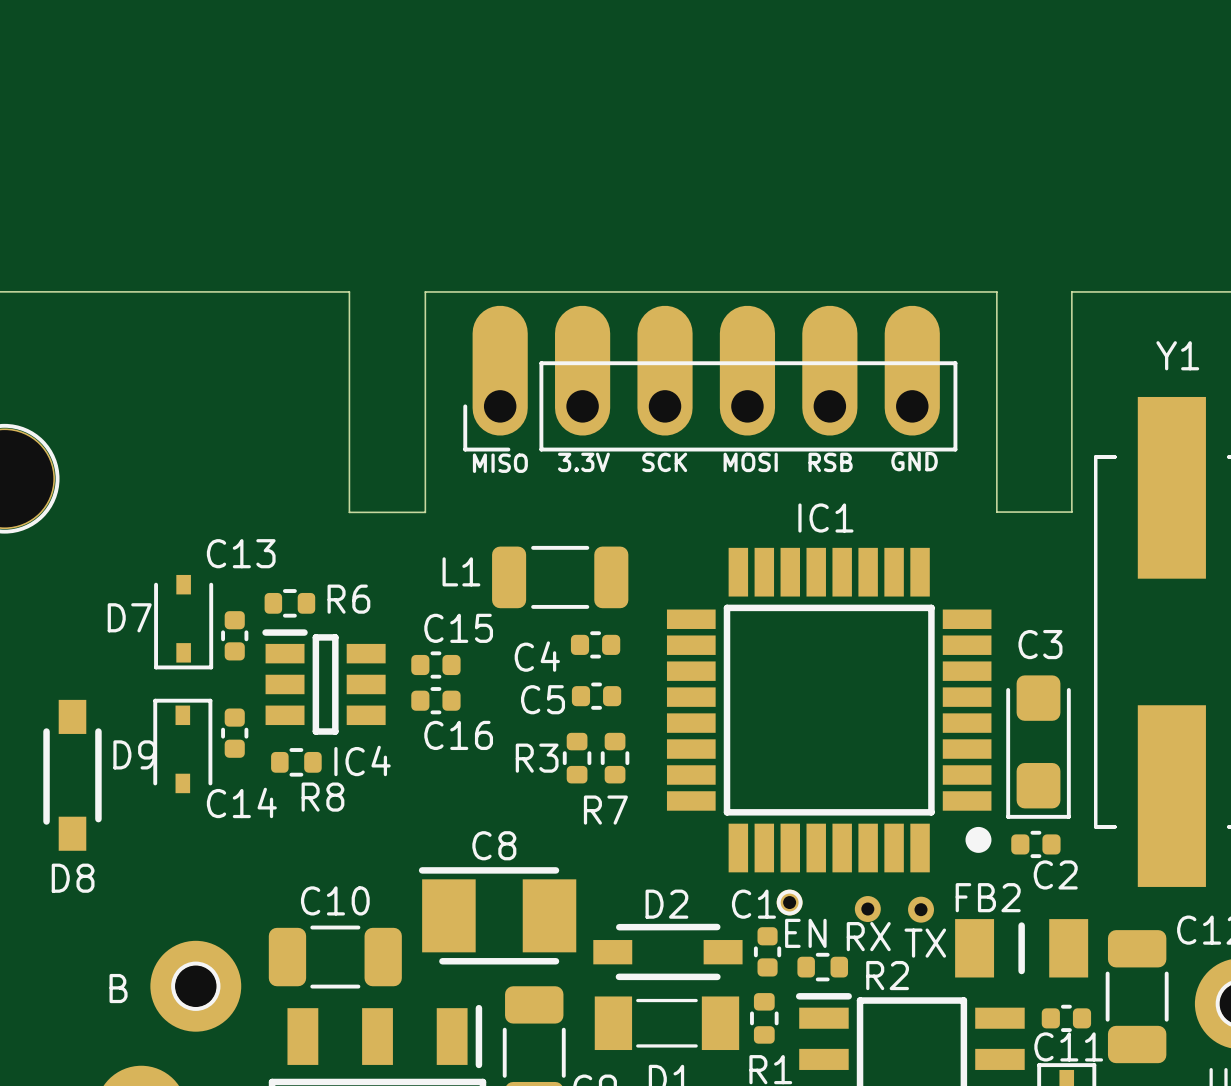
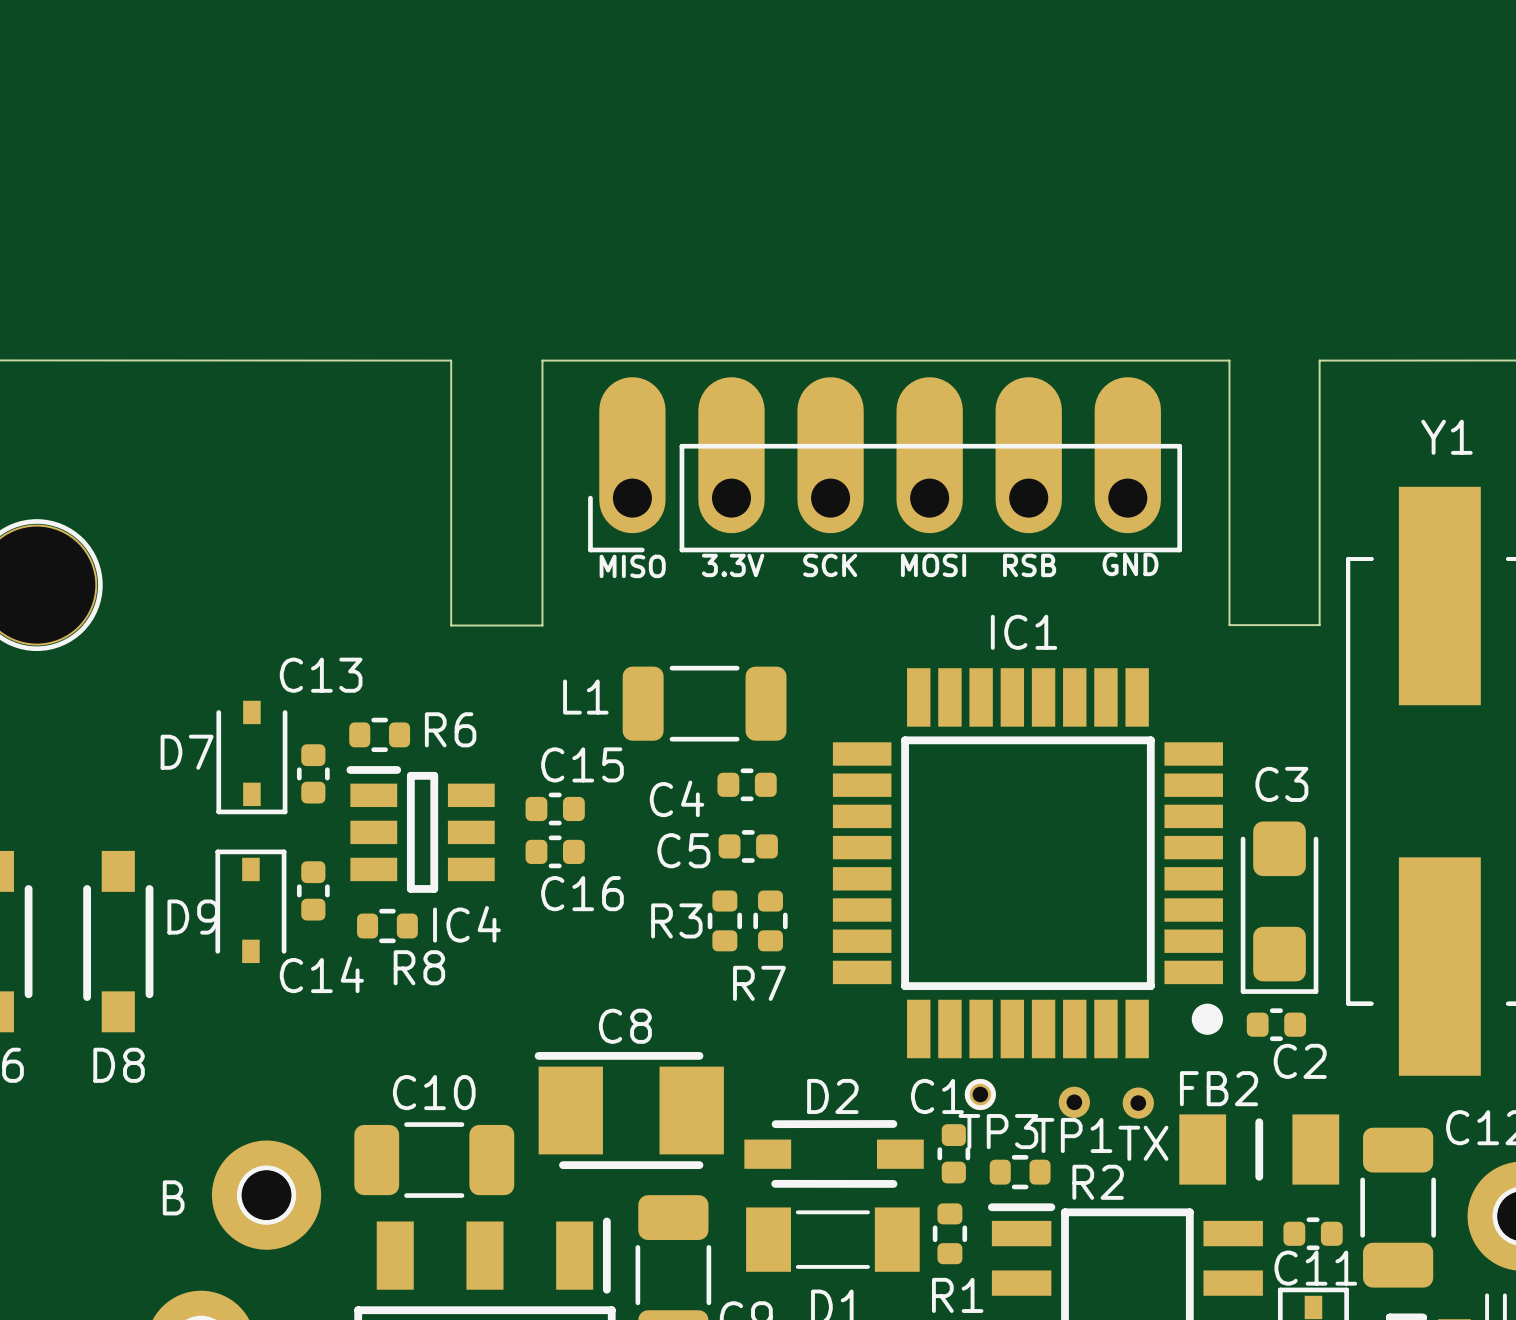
EN name: EN (805, 933) -> TP3 (998, 1131)
RX name: RX (868, 936) -> TP1 (1072, 1135)

